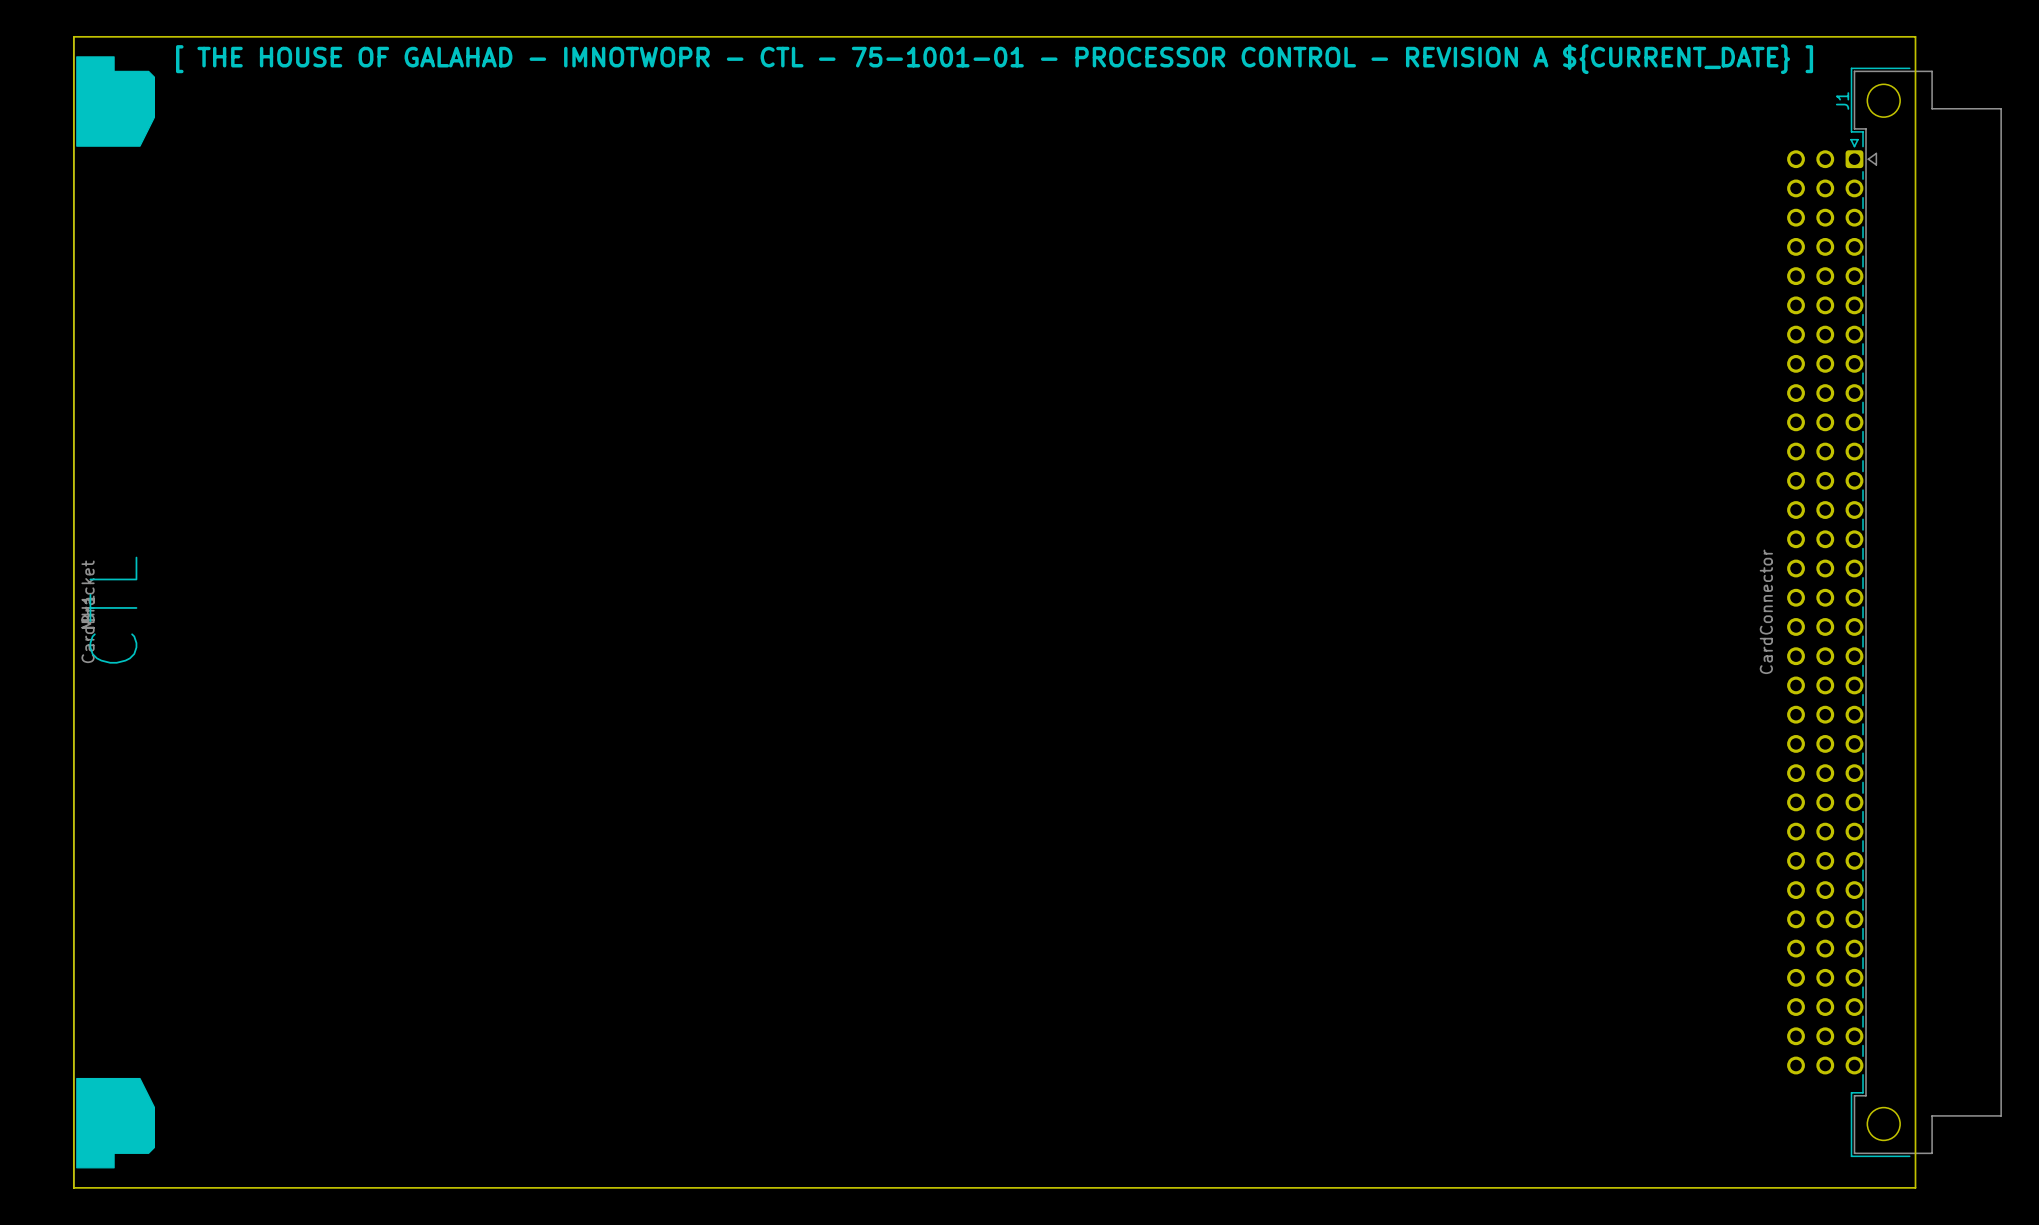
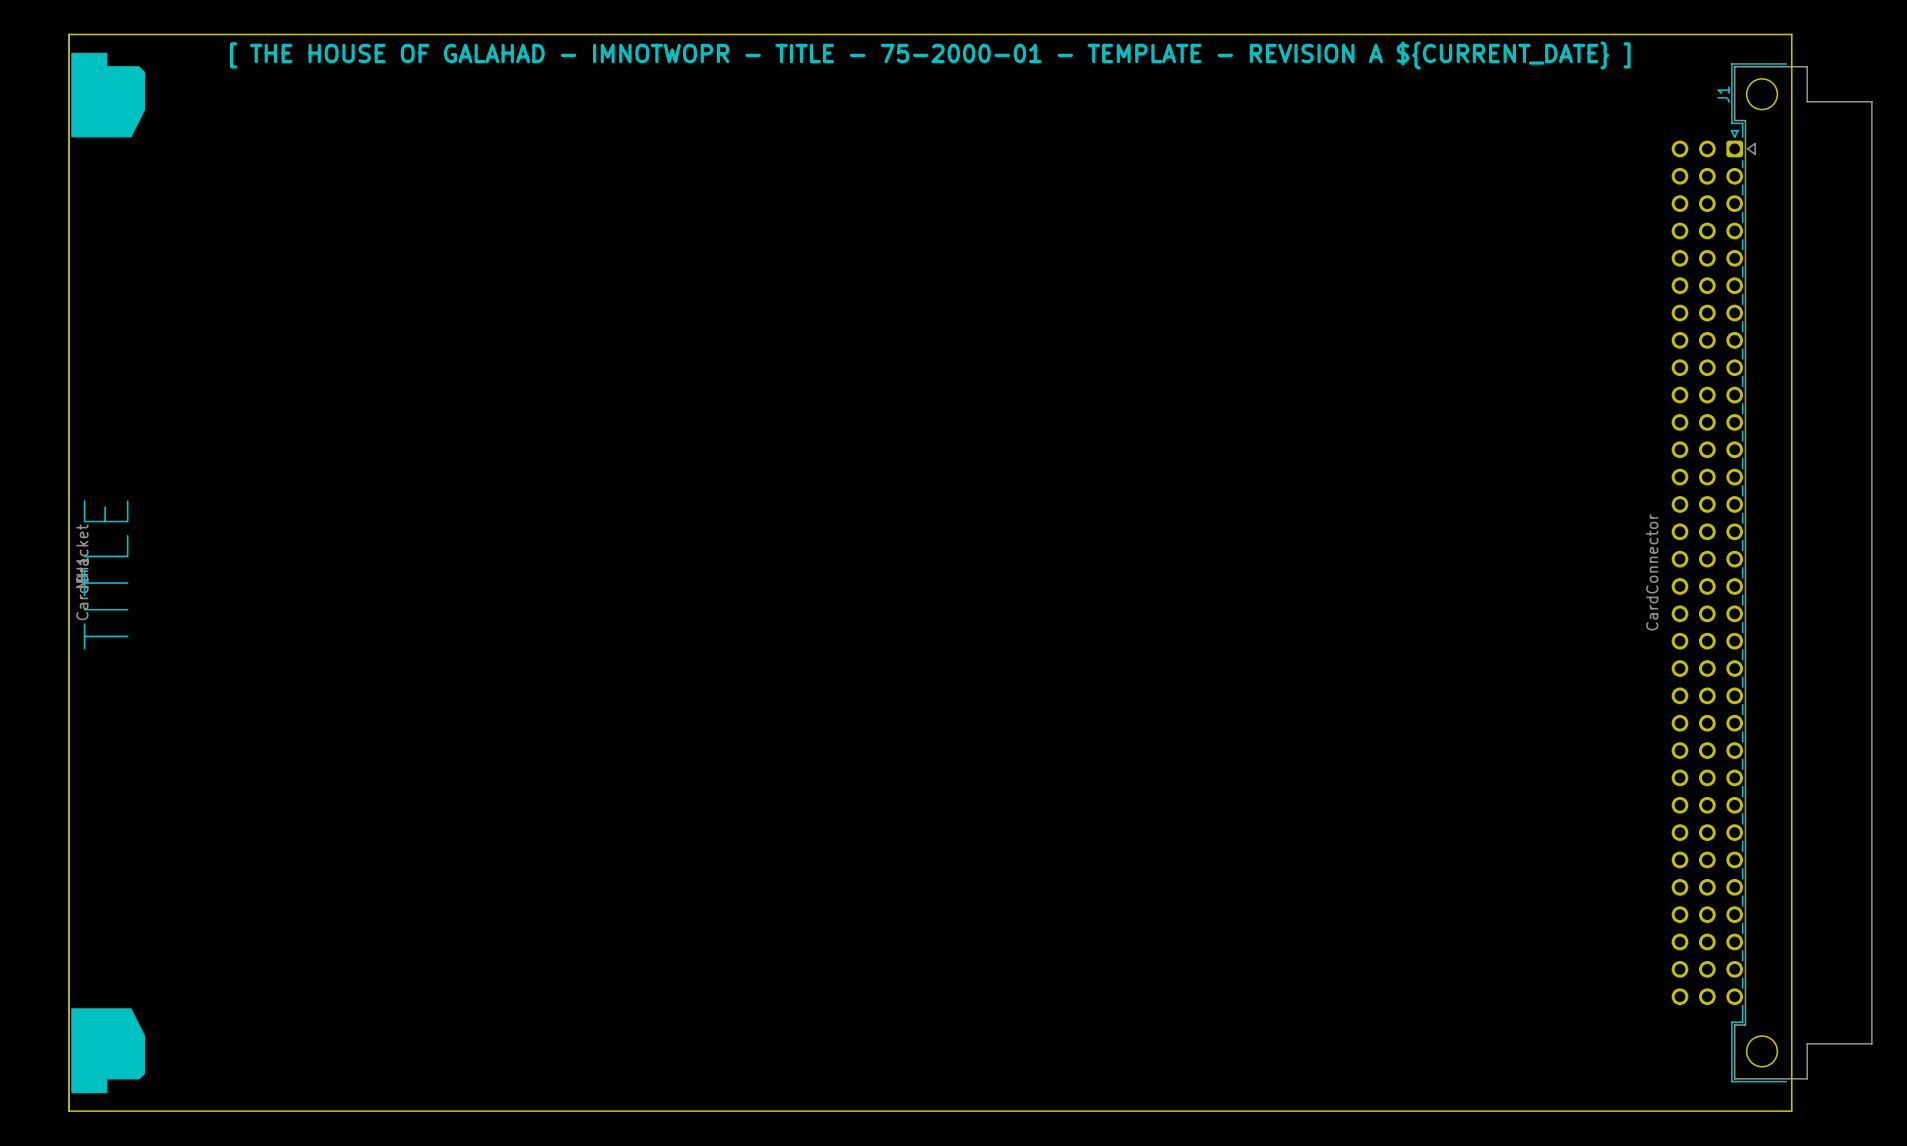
text: [ THE HOUSE OF GALAHAD - IMNOTWOPR - CTL - 75-1001-01 - PROCESSOR CONTROL - REVISION A ${CURRENT_DATE} ] (994, 59) -> [ THE HOUSE OF GALAHAD - IMNOTWOPR - TITLE - 75-2000-01 - TEMPLATE - REVISION A ${CURRENT_DATE} ] (930, 55)
text: CTL (113, 610) -> TITLE (106, 574)

